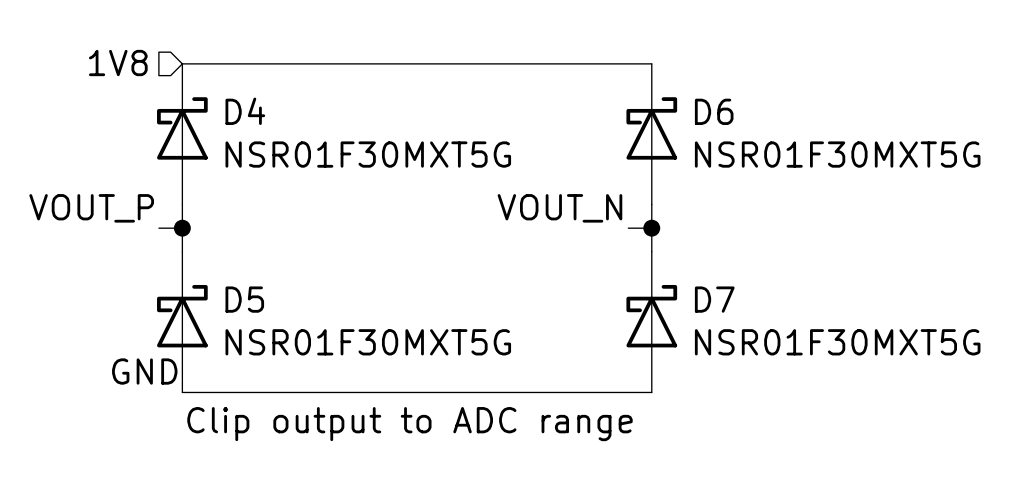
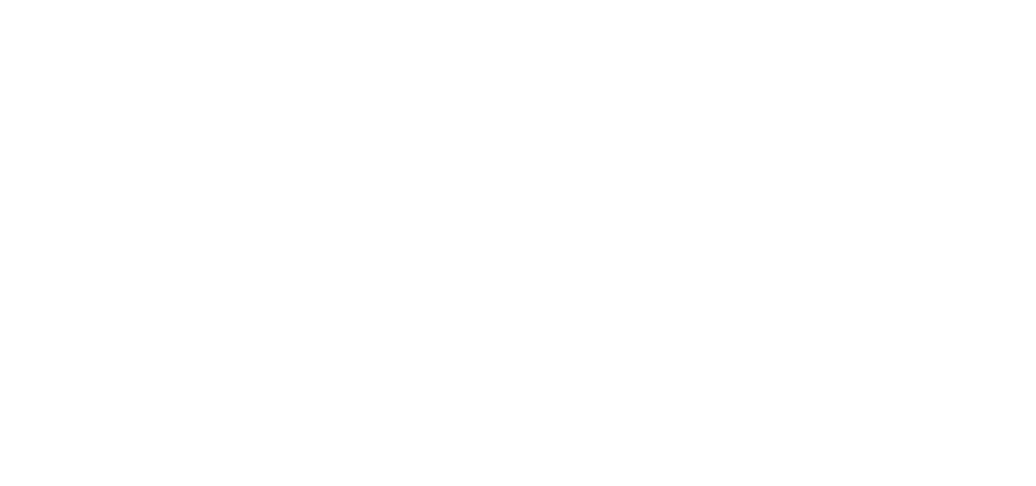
hierarchical label: 1V8 (118, 63) -> none
wire: (182, 63) (651, 63) -> none
D4: NSR01F30MXT5G (182, 134) -> none
D6: NSR01F30MXT5G (651, 134) -> none
wire: (182, 204) (182, 251) -> none
wire: (651, 204) (651, 251) -> none
label: VOUT_P (91, 208) -> none
label: VOUT_N (559, 208) -> none
wire: (158, 228) (182, 228) -> none
junction: (182, 228) -> none
wire: (628, 228) (651, 228) -> none
junction: (651, 228) -> none
D5: NSR01F30MXT5G (182, 322) -> none
D7: NSR01F30MXT5G (651, 322) -> none
label: GND (144, 371) -> none
wire: (182, 392) (651, 392) -> none
text: Clip output to ADC range (409, 424) -> none

